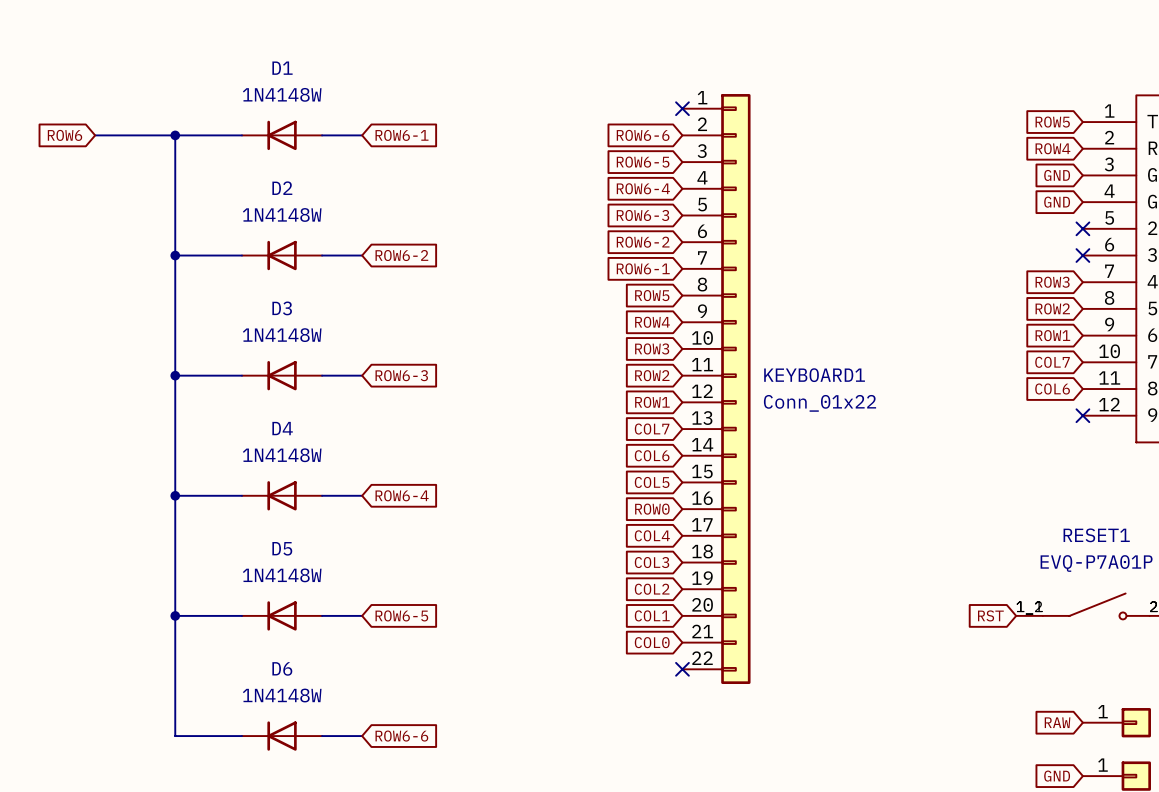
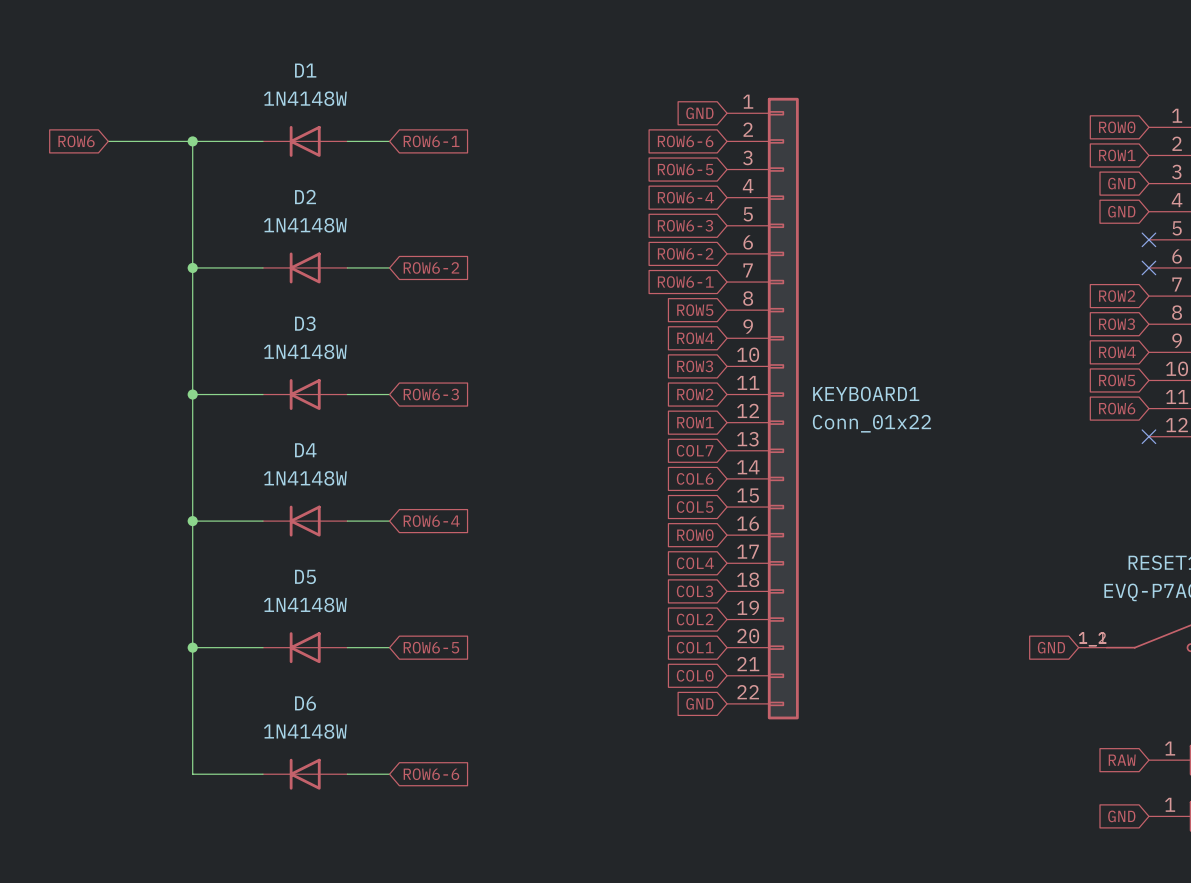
global label: none -> GND (699, 113)
no-connect mark: (682, 108) -> none
global label: ROW5 (1052, 122) -> ROW0 (1117, 127)
global label: ROW4 (1052, 148) -> ROW1 (1117, 155)
global label: ROW3 (1052, 282) -> ROW2 (1117, 296)
global label: ROW2 (1052, 308) -> ROW3 (1117, 324)
global label: ROW1 (1052, 335) -> ROW4 (1117, 352)
global label: COL7 (1052, 362) -> ROW5 (1117, 380)
global label: COL6 (1052, 389) -> ROW6 (1117, 408)
global label: RST (990, 615) -> GND (1051, 647)
global label: none -> GND (699, 703)
no-connect mark: (682, 669) -> none

